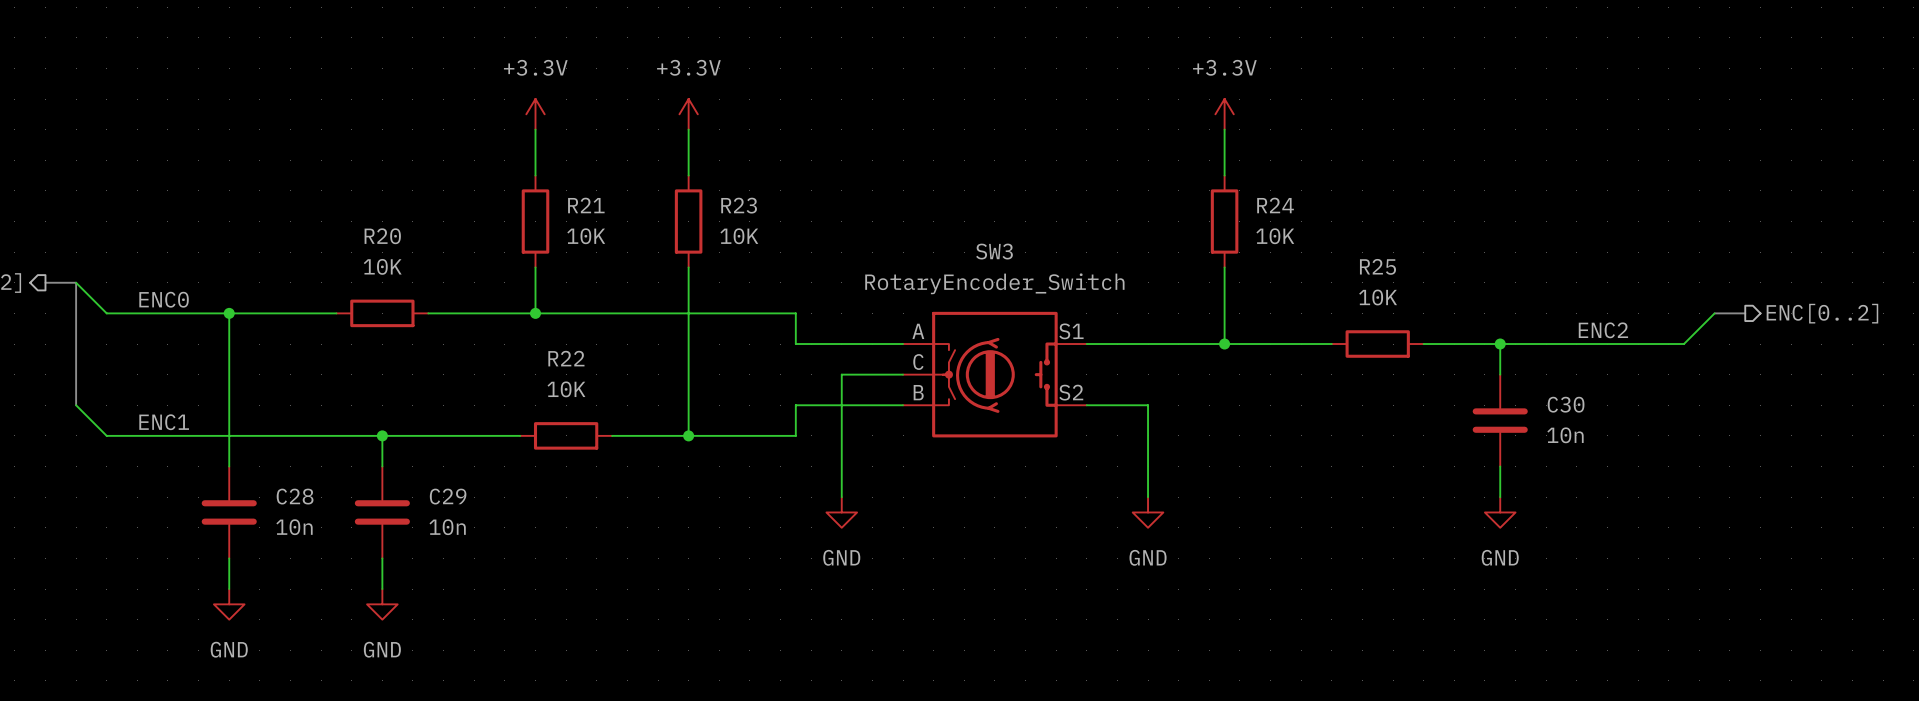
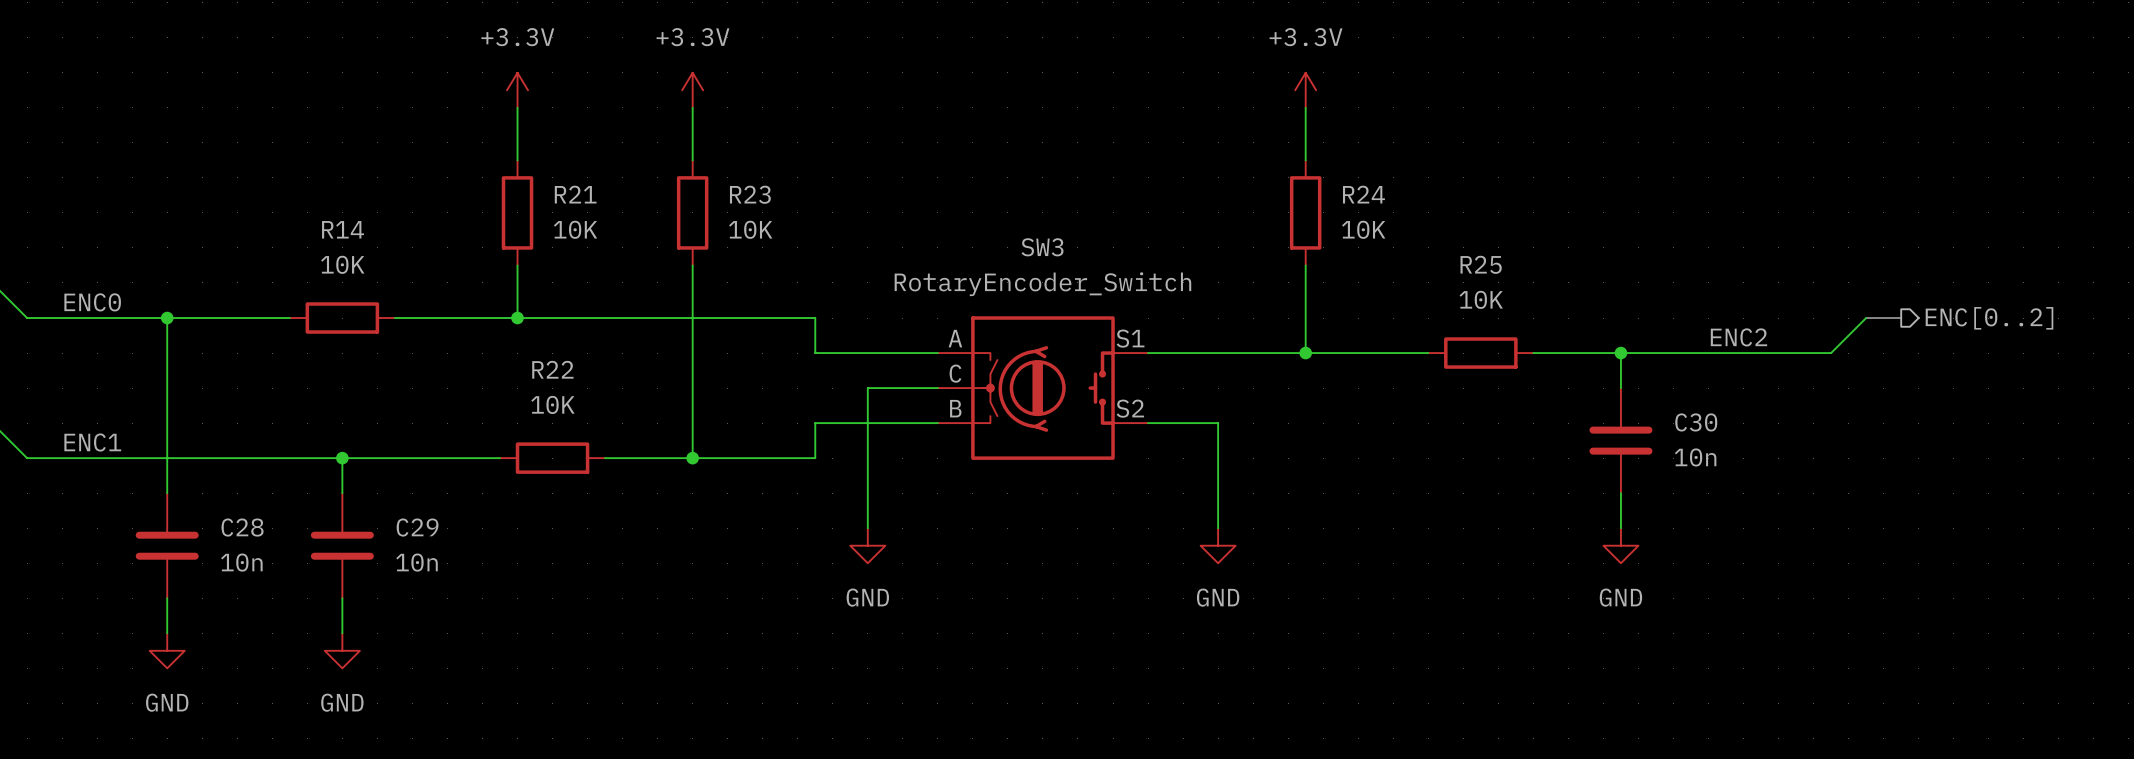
R20 name: R20 (382, 236) -> R14 (343, 229)

